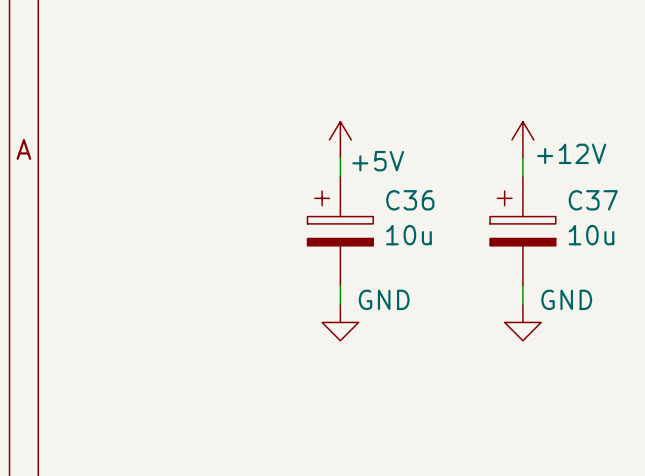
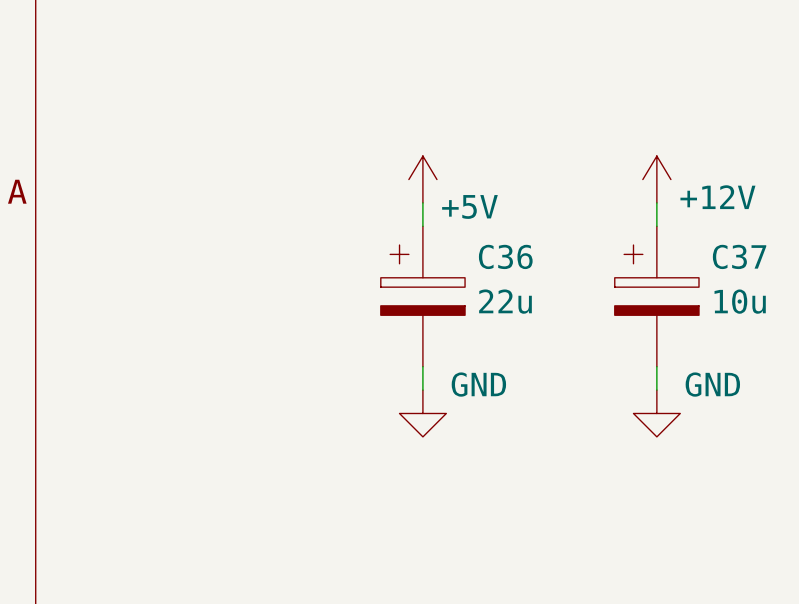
C36 value: 10u (409, 235) -> 22u (505, 301)

